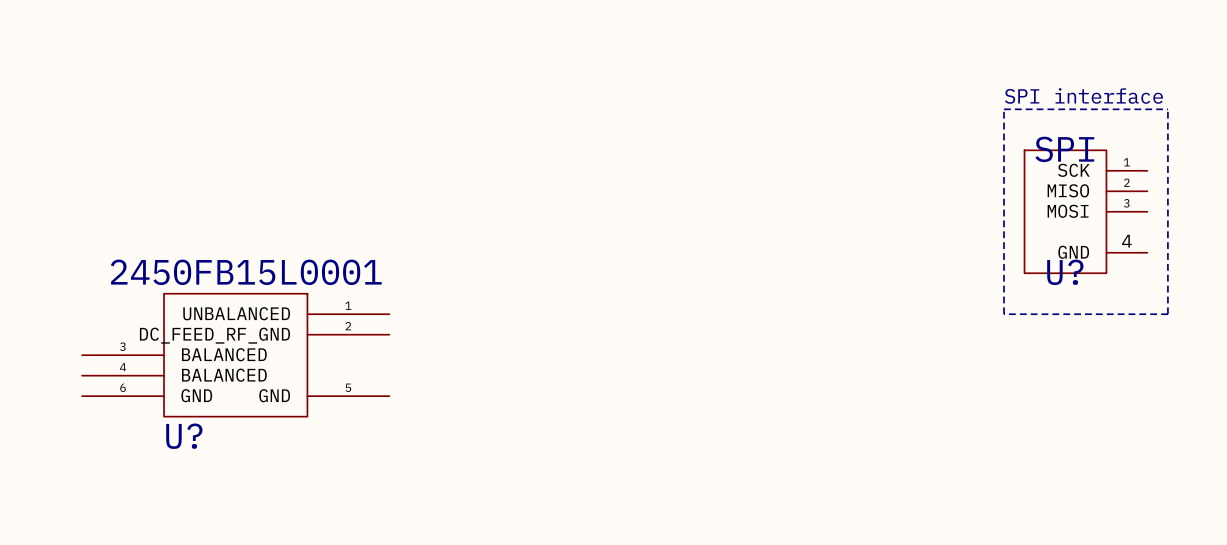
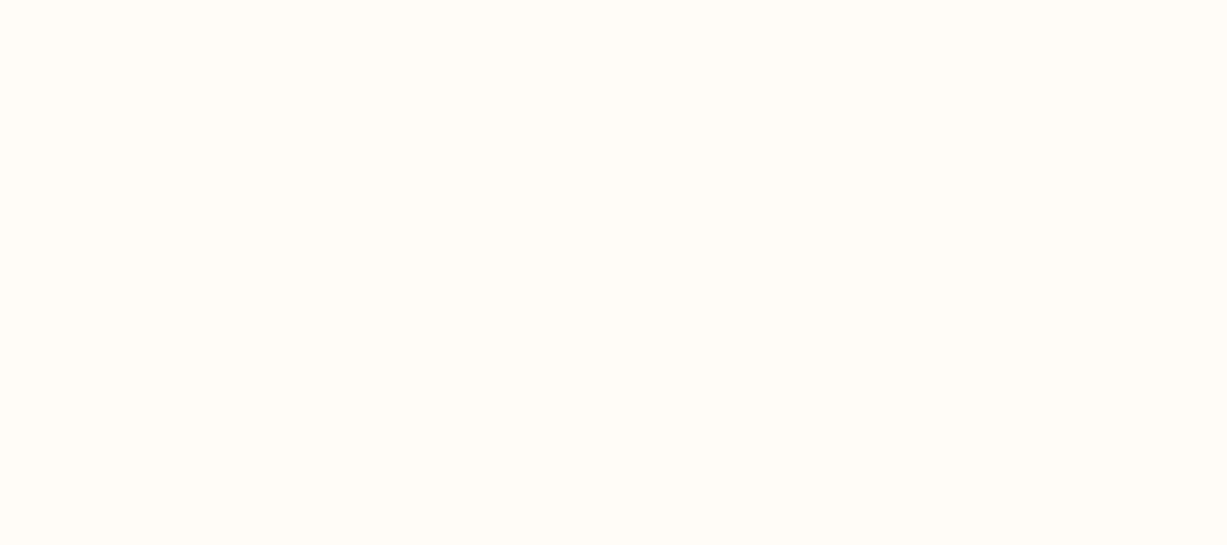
text: SPI interface (1083, 95) -> none
line: (1004, 109) (1004, 314) (1167, 314) (1167, 109) (1004, 109) -> none
U?: SPI (1085, 211) -> none
U?: 2450FB15L0001 (235, 355) -> none

